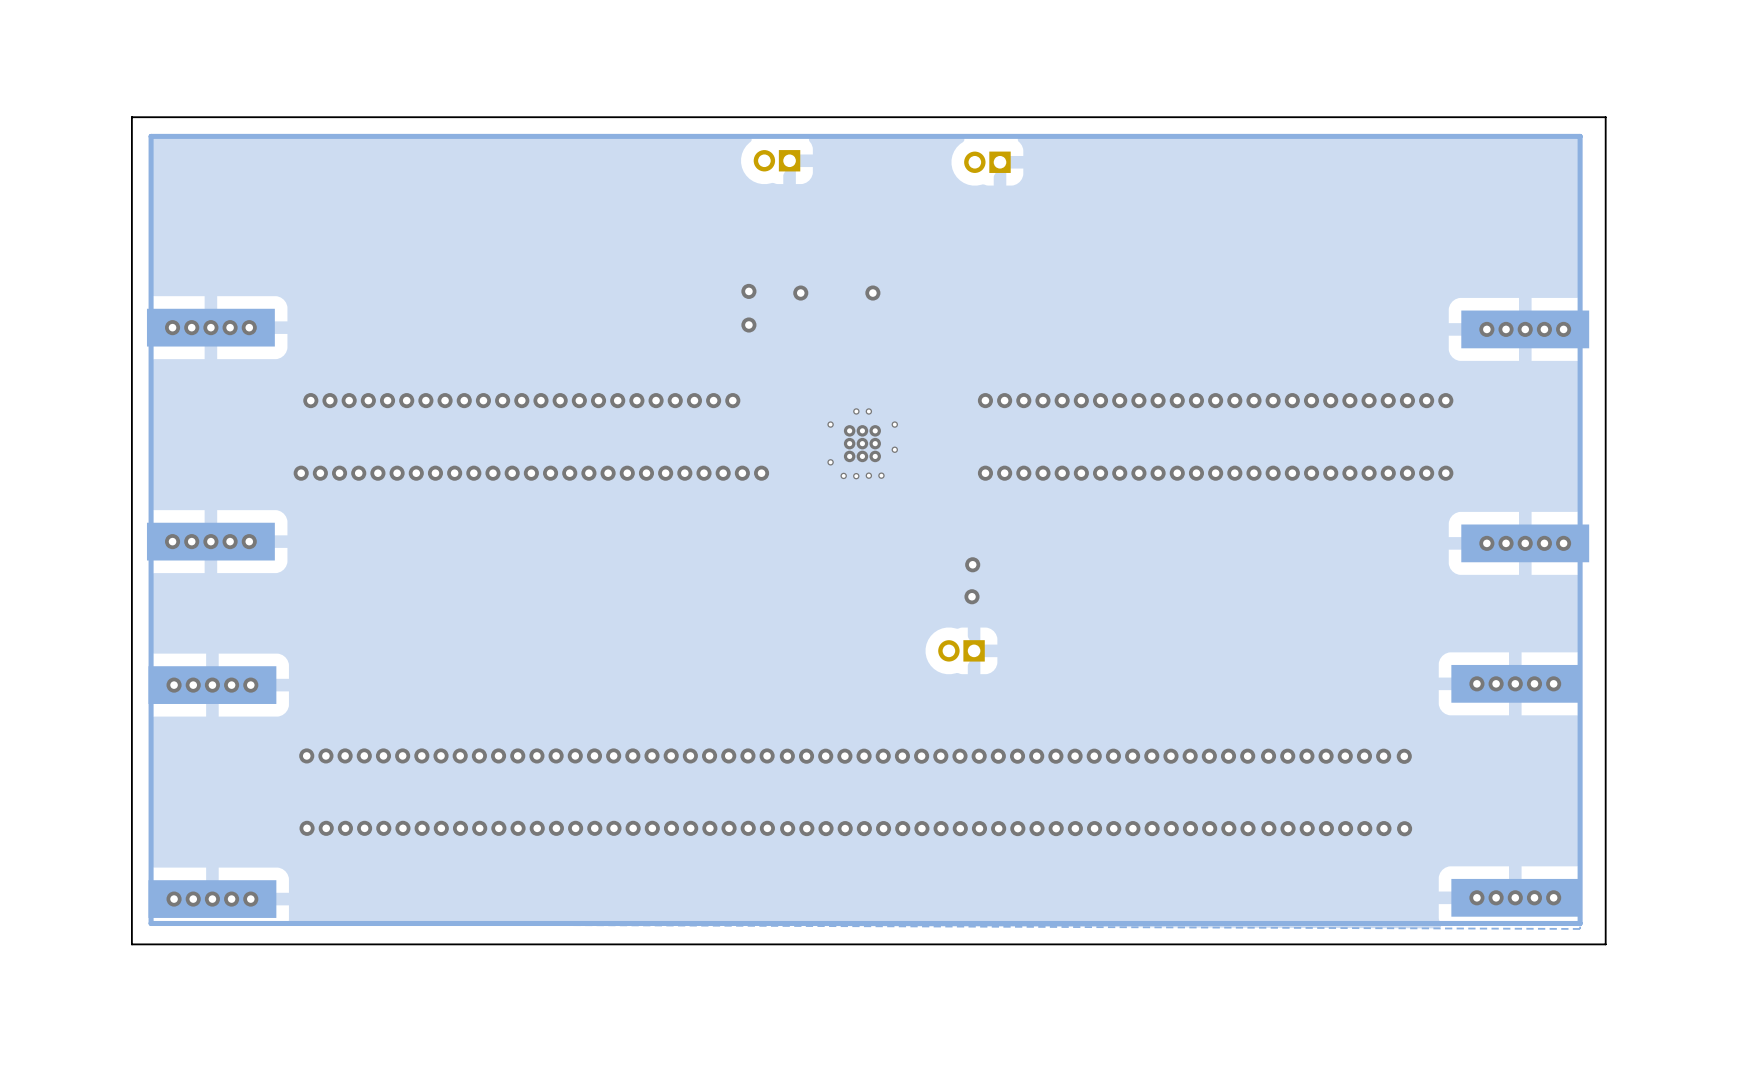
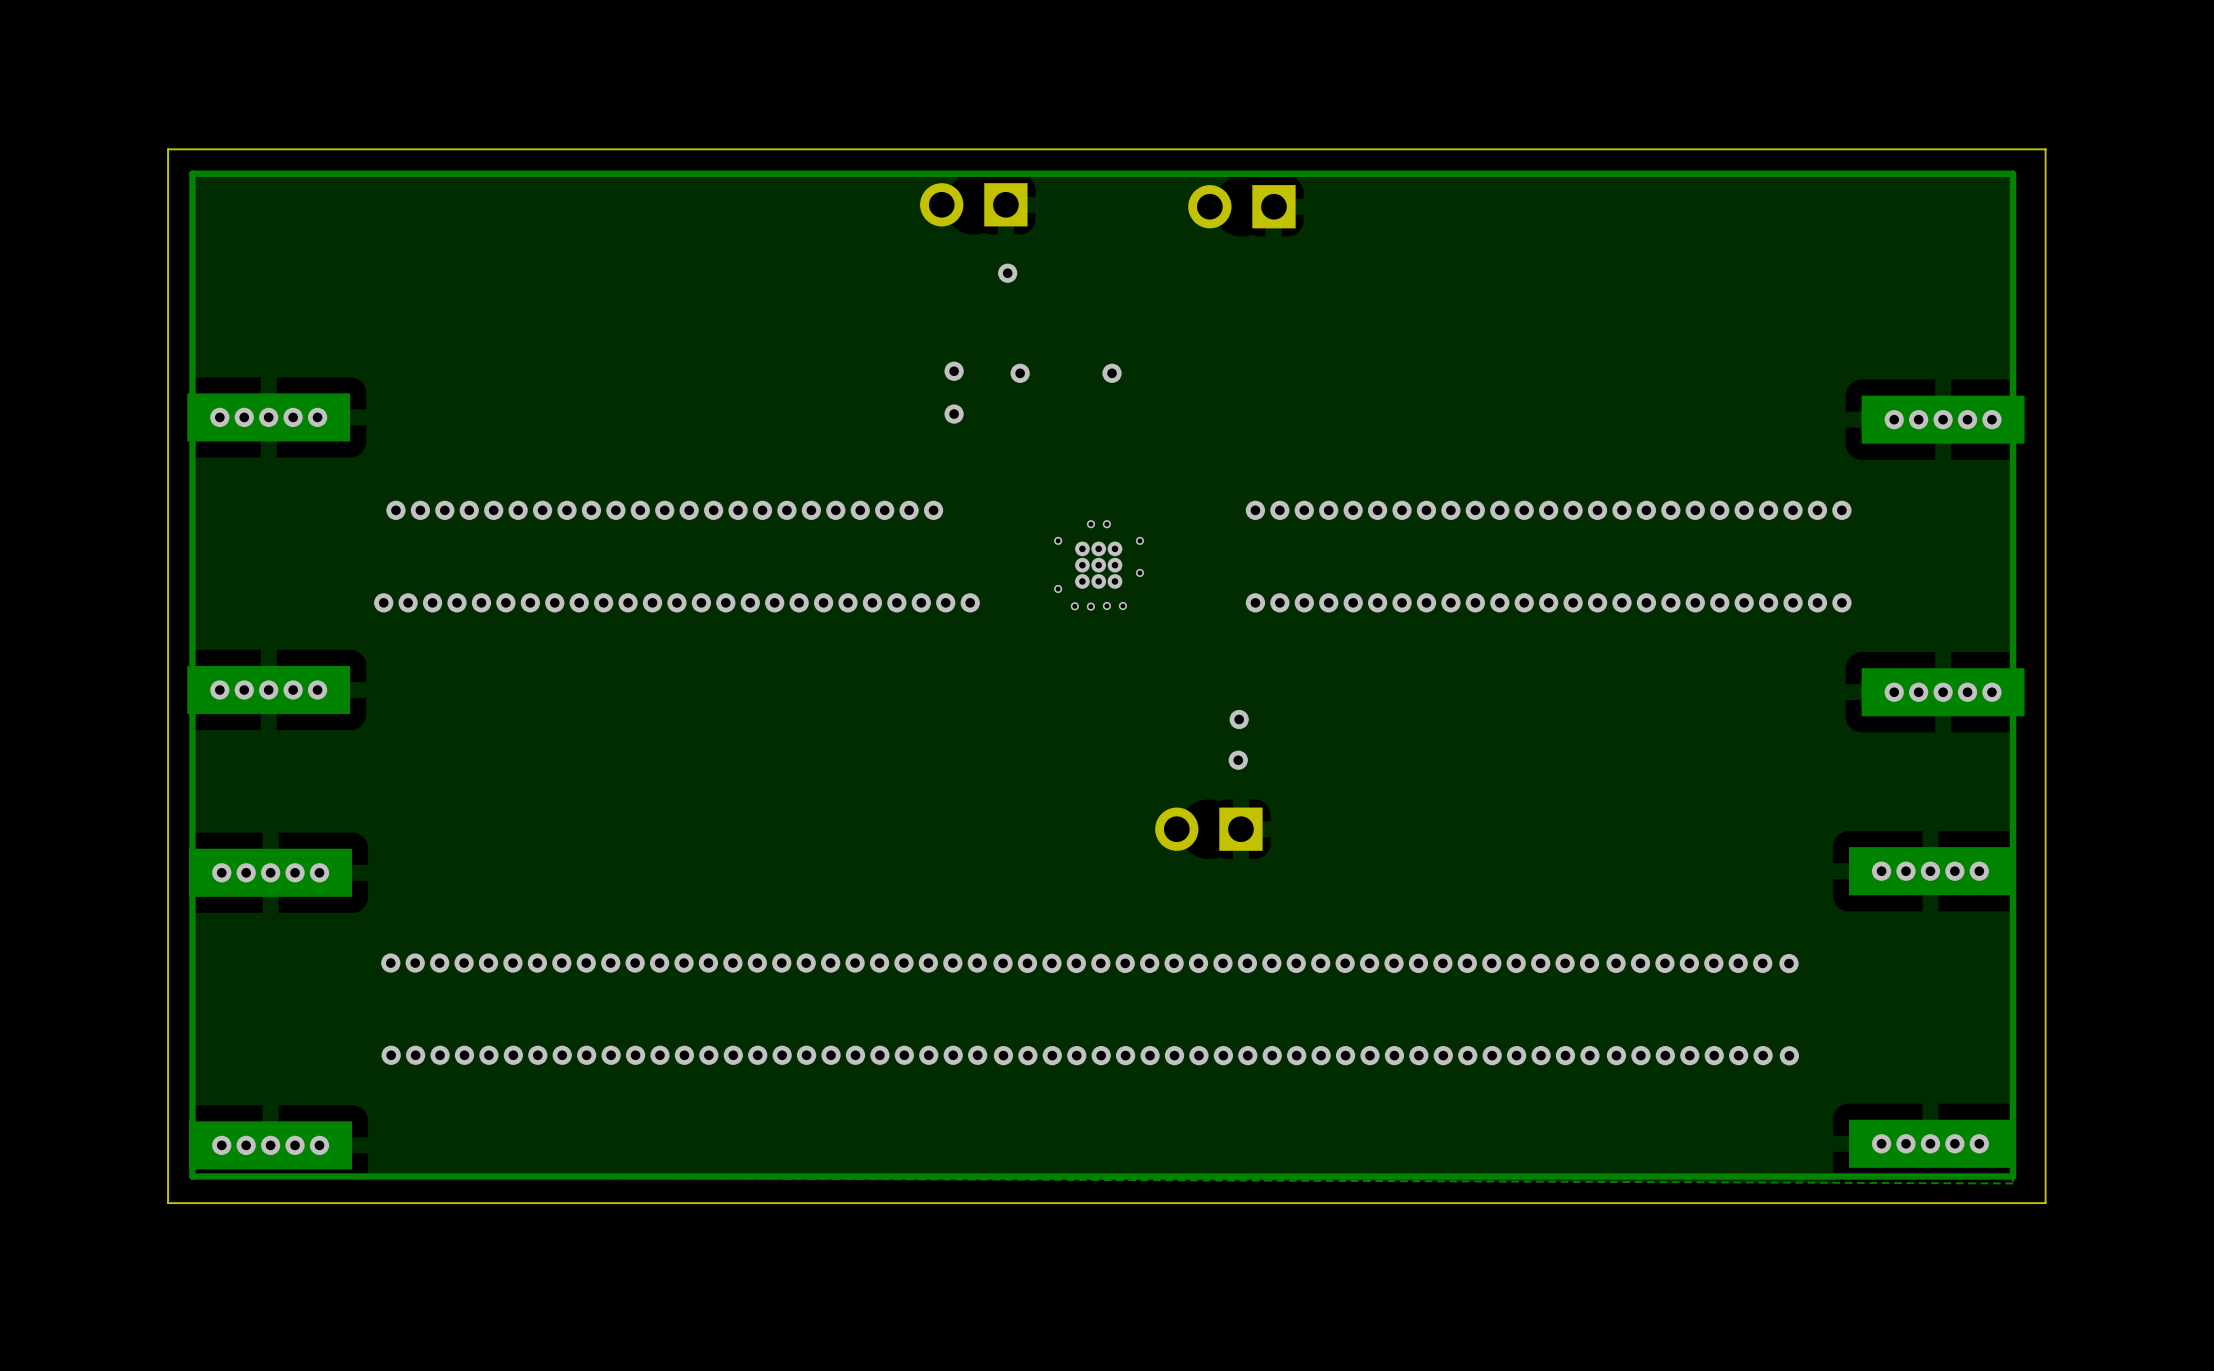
part footprint: [753, 150, 801, 172] -> [920, 183, 1028, 227]
part footprint: [964, 151, 1011, 173] -> [1188, 185, 1296, 229]
via: none -> (1007, 273)
part footprint: [938, 640, 985, 662] -> [1155, 807, 1263, 851]

